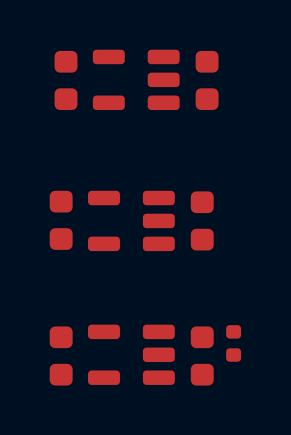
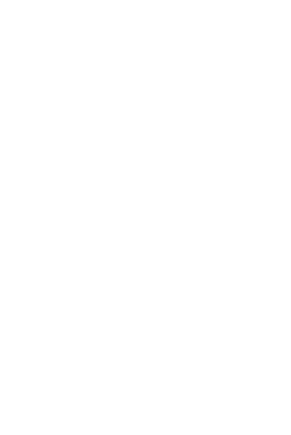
part: (136, 79) -> none
part: (66, 80) -> none
part: (207, 80) -> none
part: (61, 220) -> none
part: (131, 220) -> none
part: (202, 220) -> none
part: (233, 343) -> none
part: (131, 354) -> none
part: (61, 355) -> none
part: (202, 355) -> none

